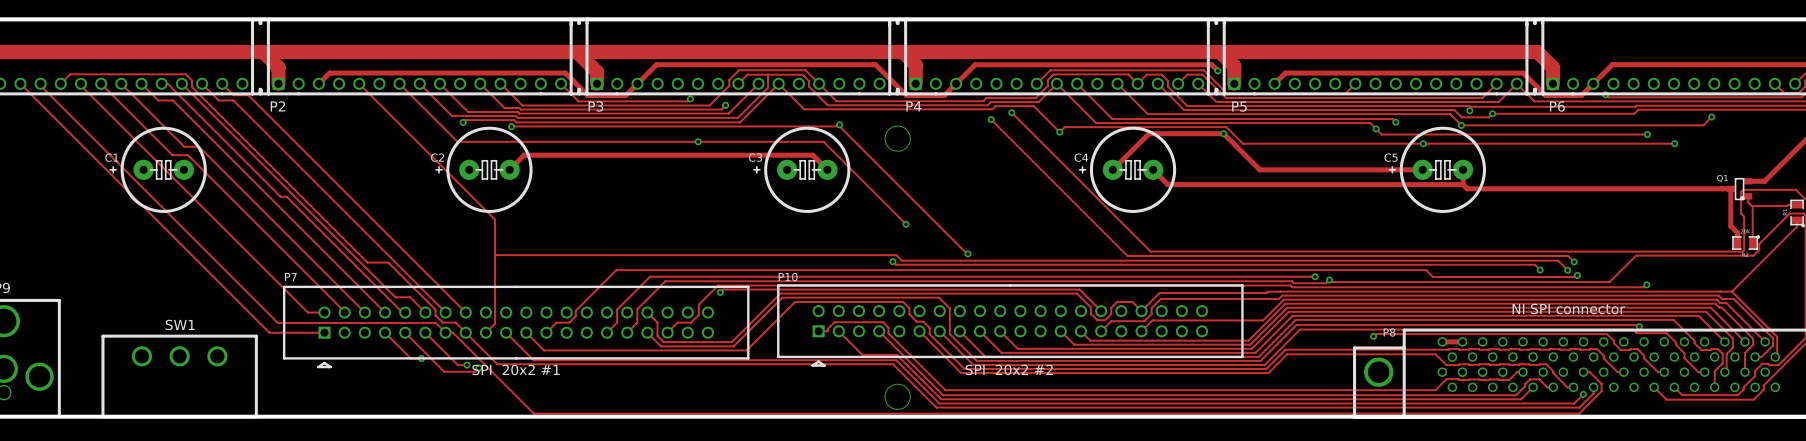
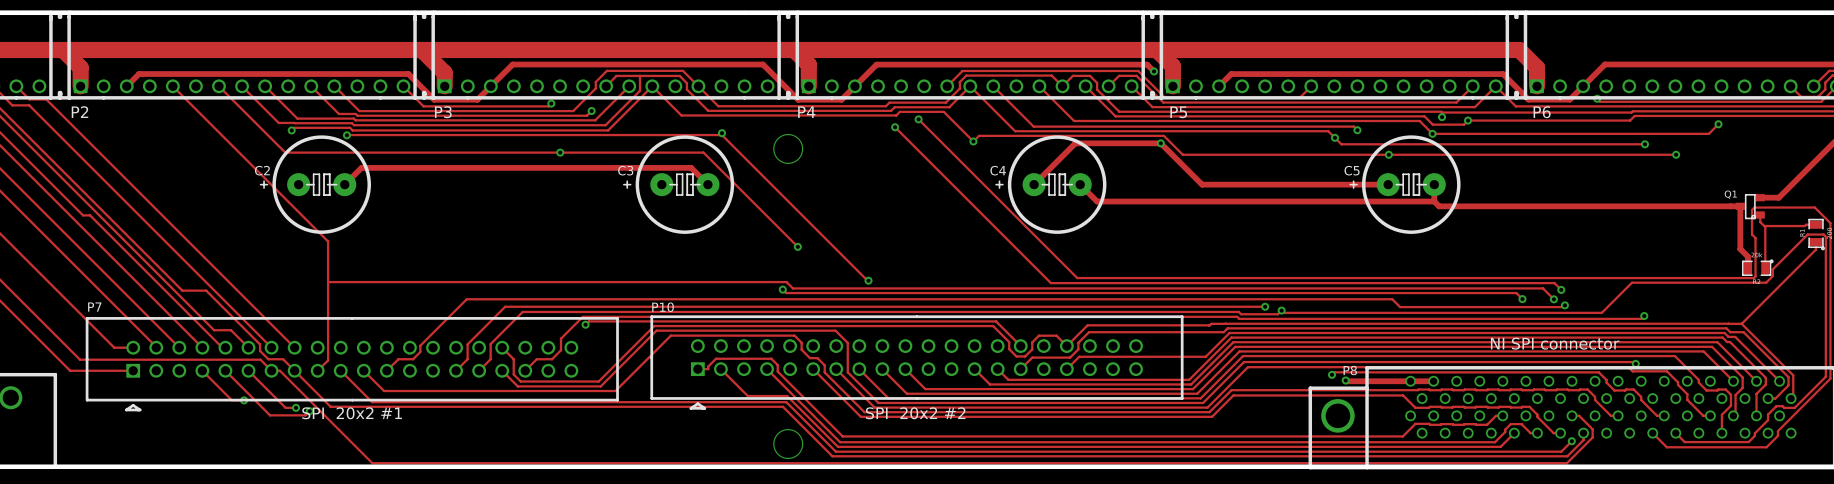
track: none -> (1345, 380) (1410, 381)
via: none -> (1345, 380)

